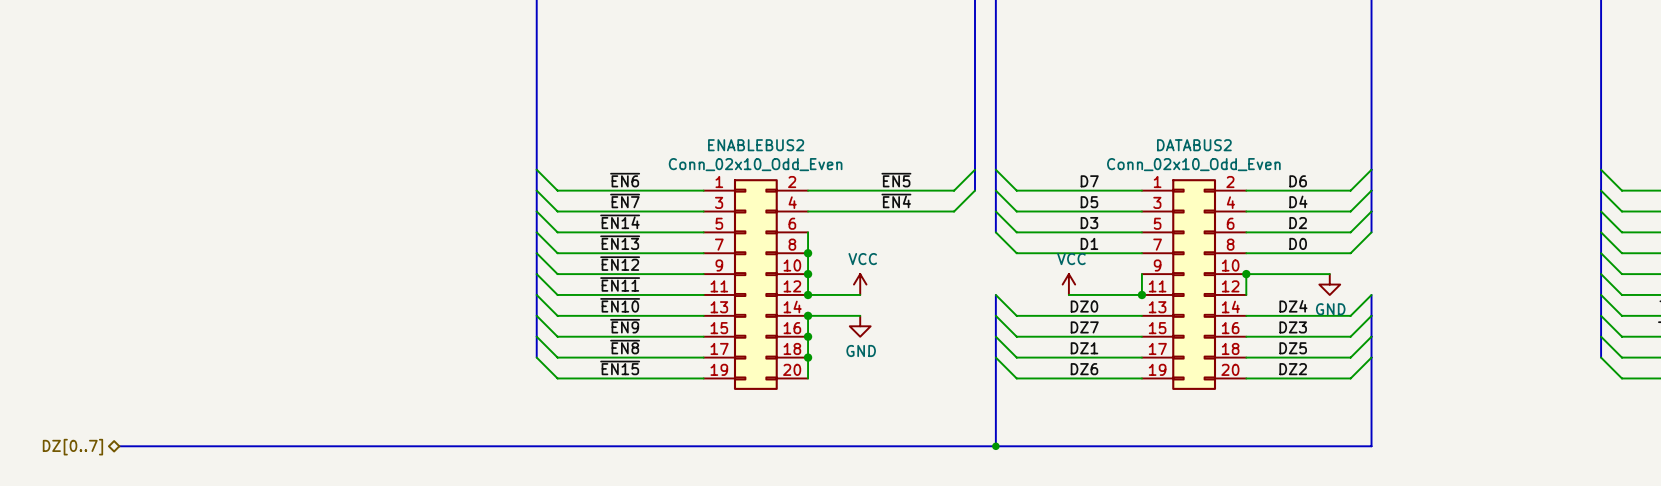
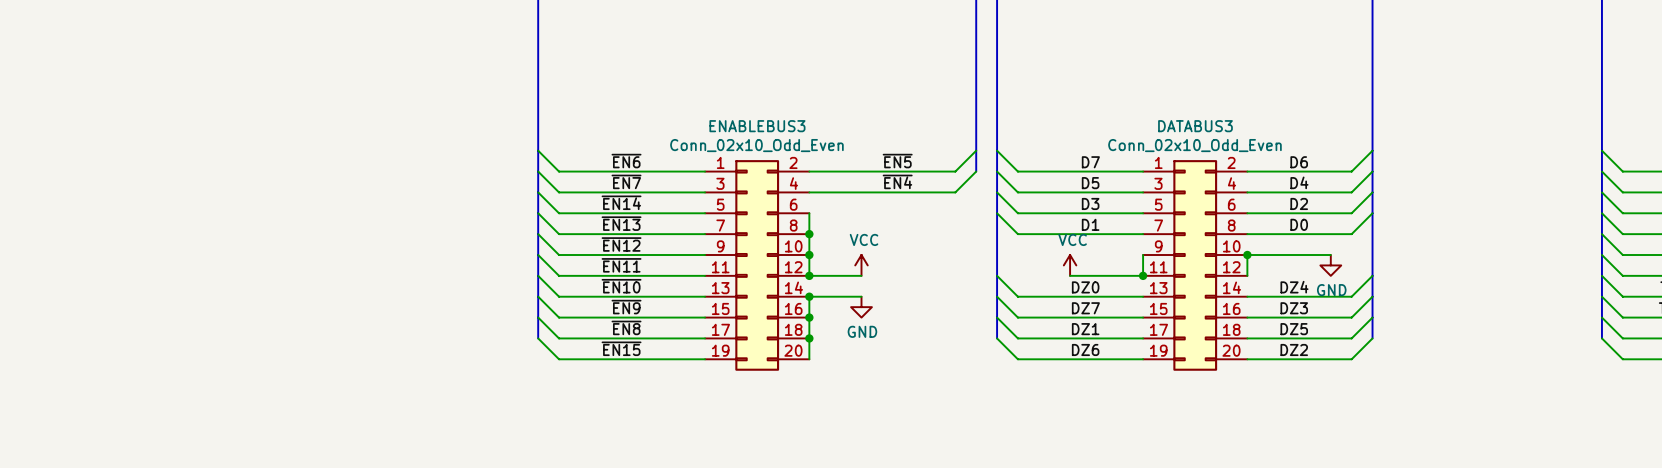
ENABLEBUS2 name: ENABLEBUS2 (756, 145) -> ENABLEBUS3 (757, 126)
DATABUS2 name: DATABUS2 (1194, 145) -> DATABUS3 (1195, 126)
bus: none -> (997, 213) (997, 275)
bus: none -> (1372, 213) (1372, 275)
bus: (995, 357) (995, 446) -> none
bus: (1371, 357) (1371, 446) (119, 446) -> none
junction: (995, 446) -> none
hierarchical label: DZ[0..7] (72, 447) -> none

